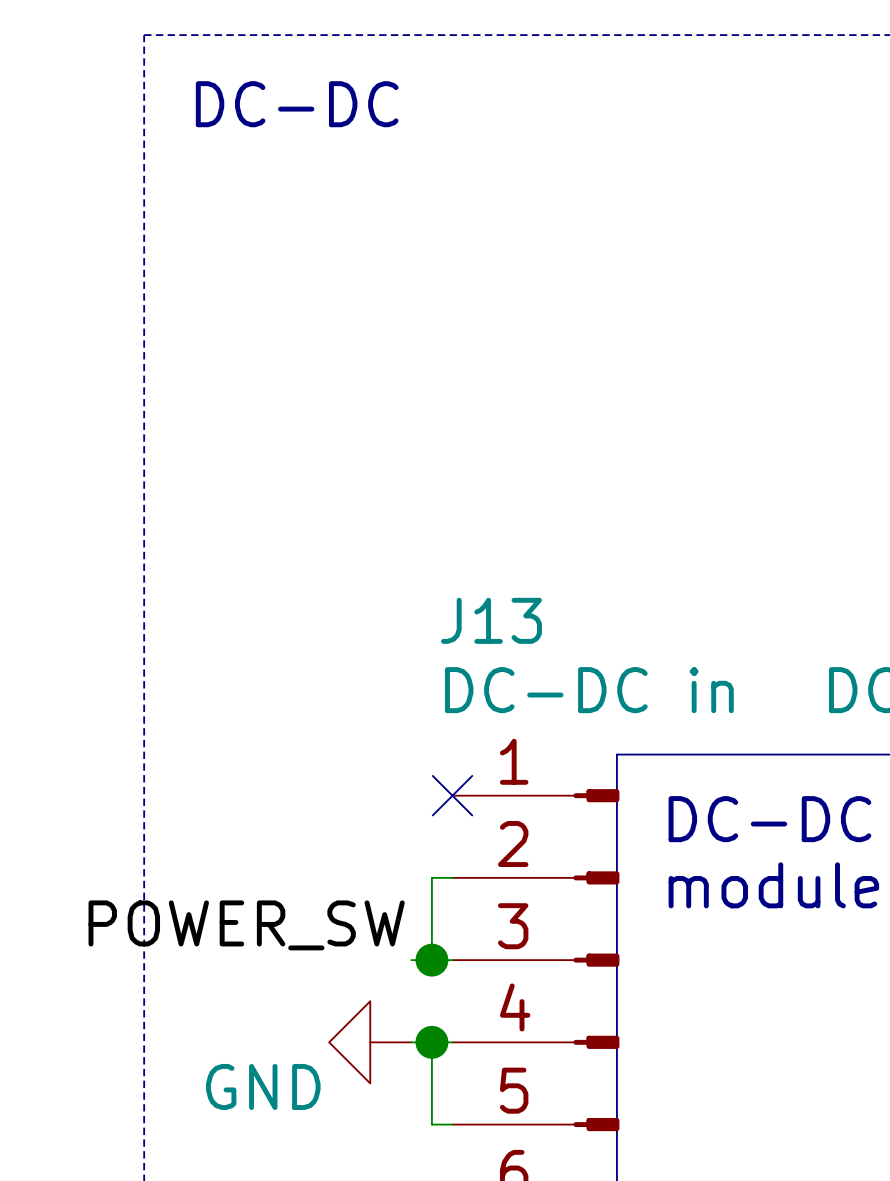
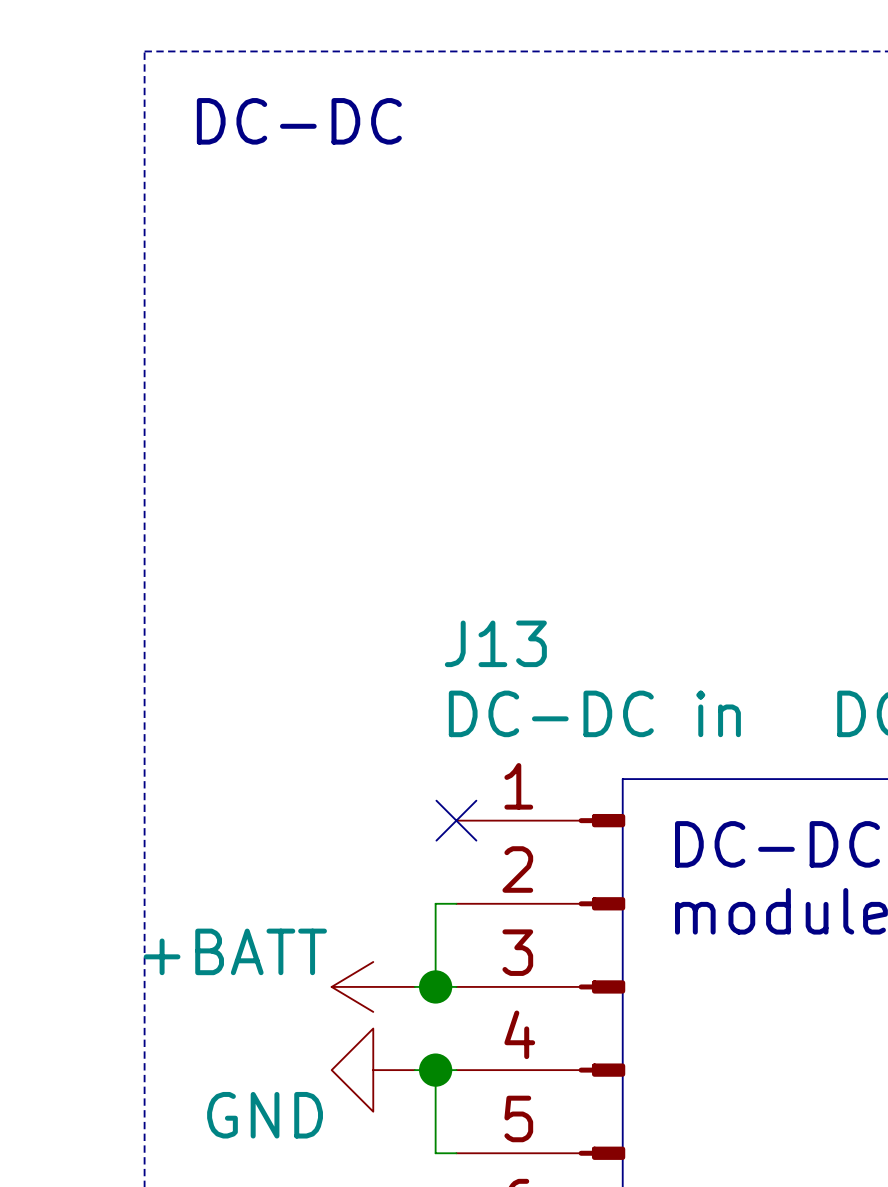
label: POWER_SW (246, 925) -> none
power symbol: none -> +BATT (373, 986)

